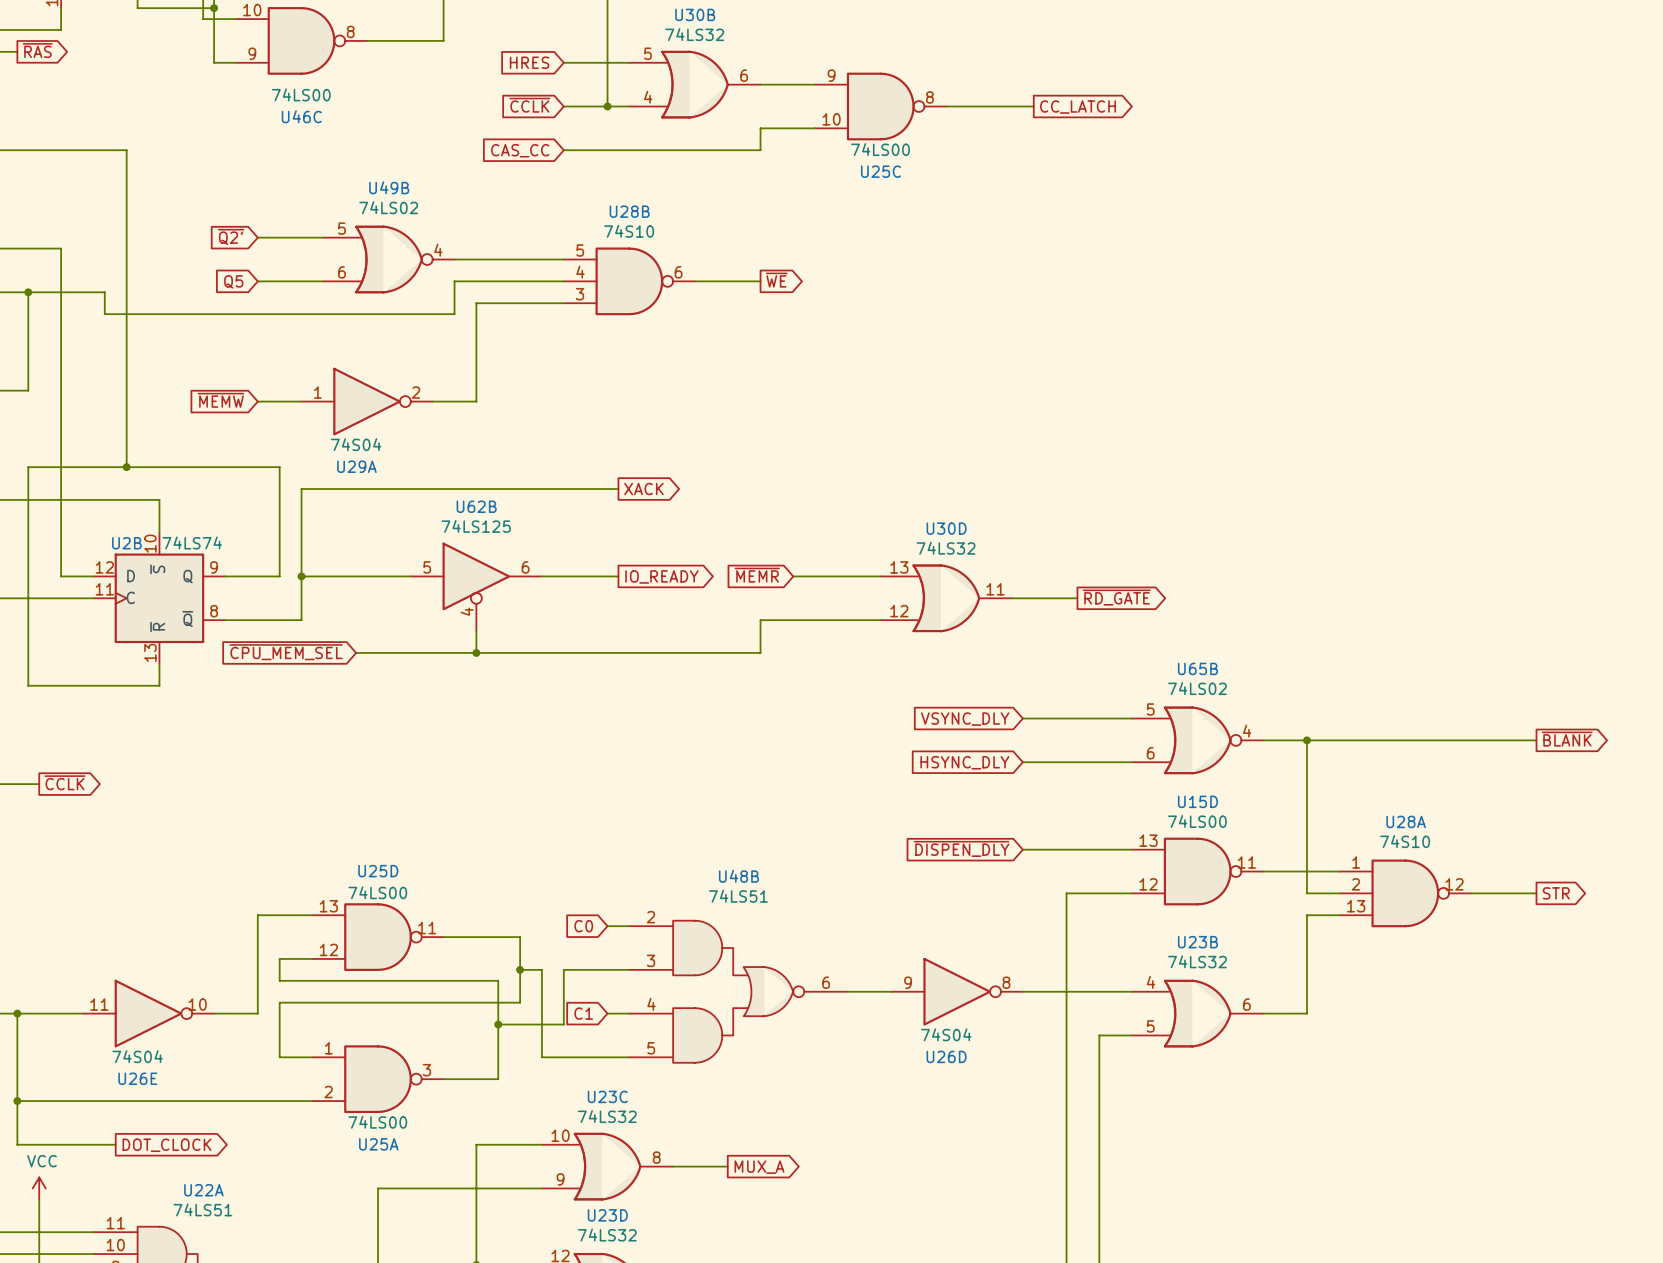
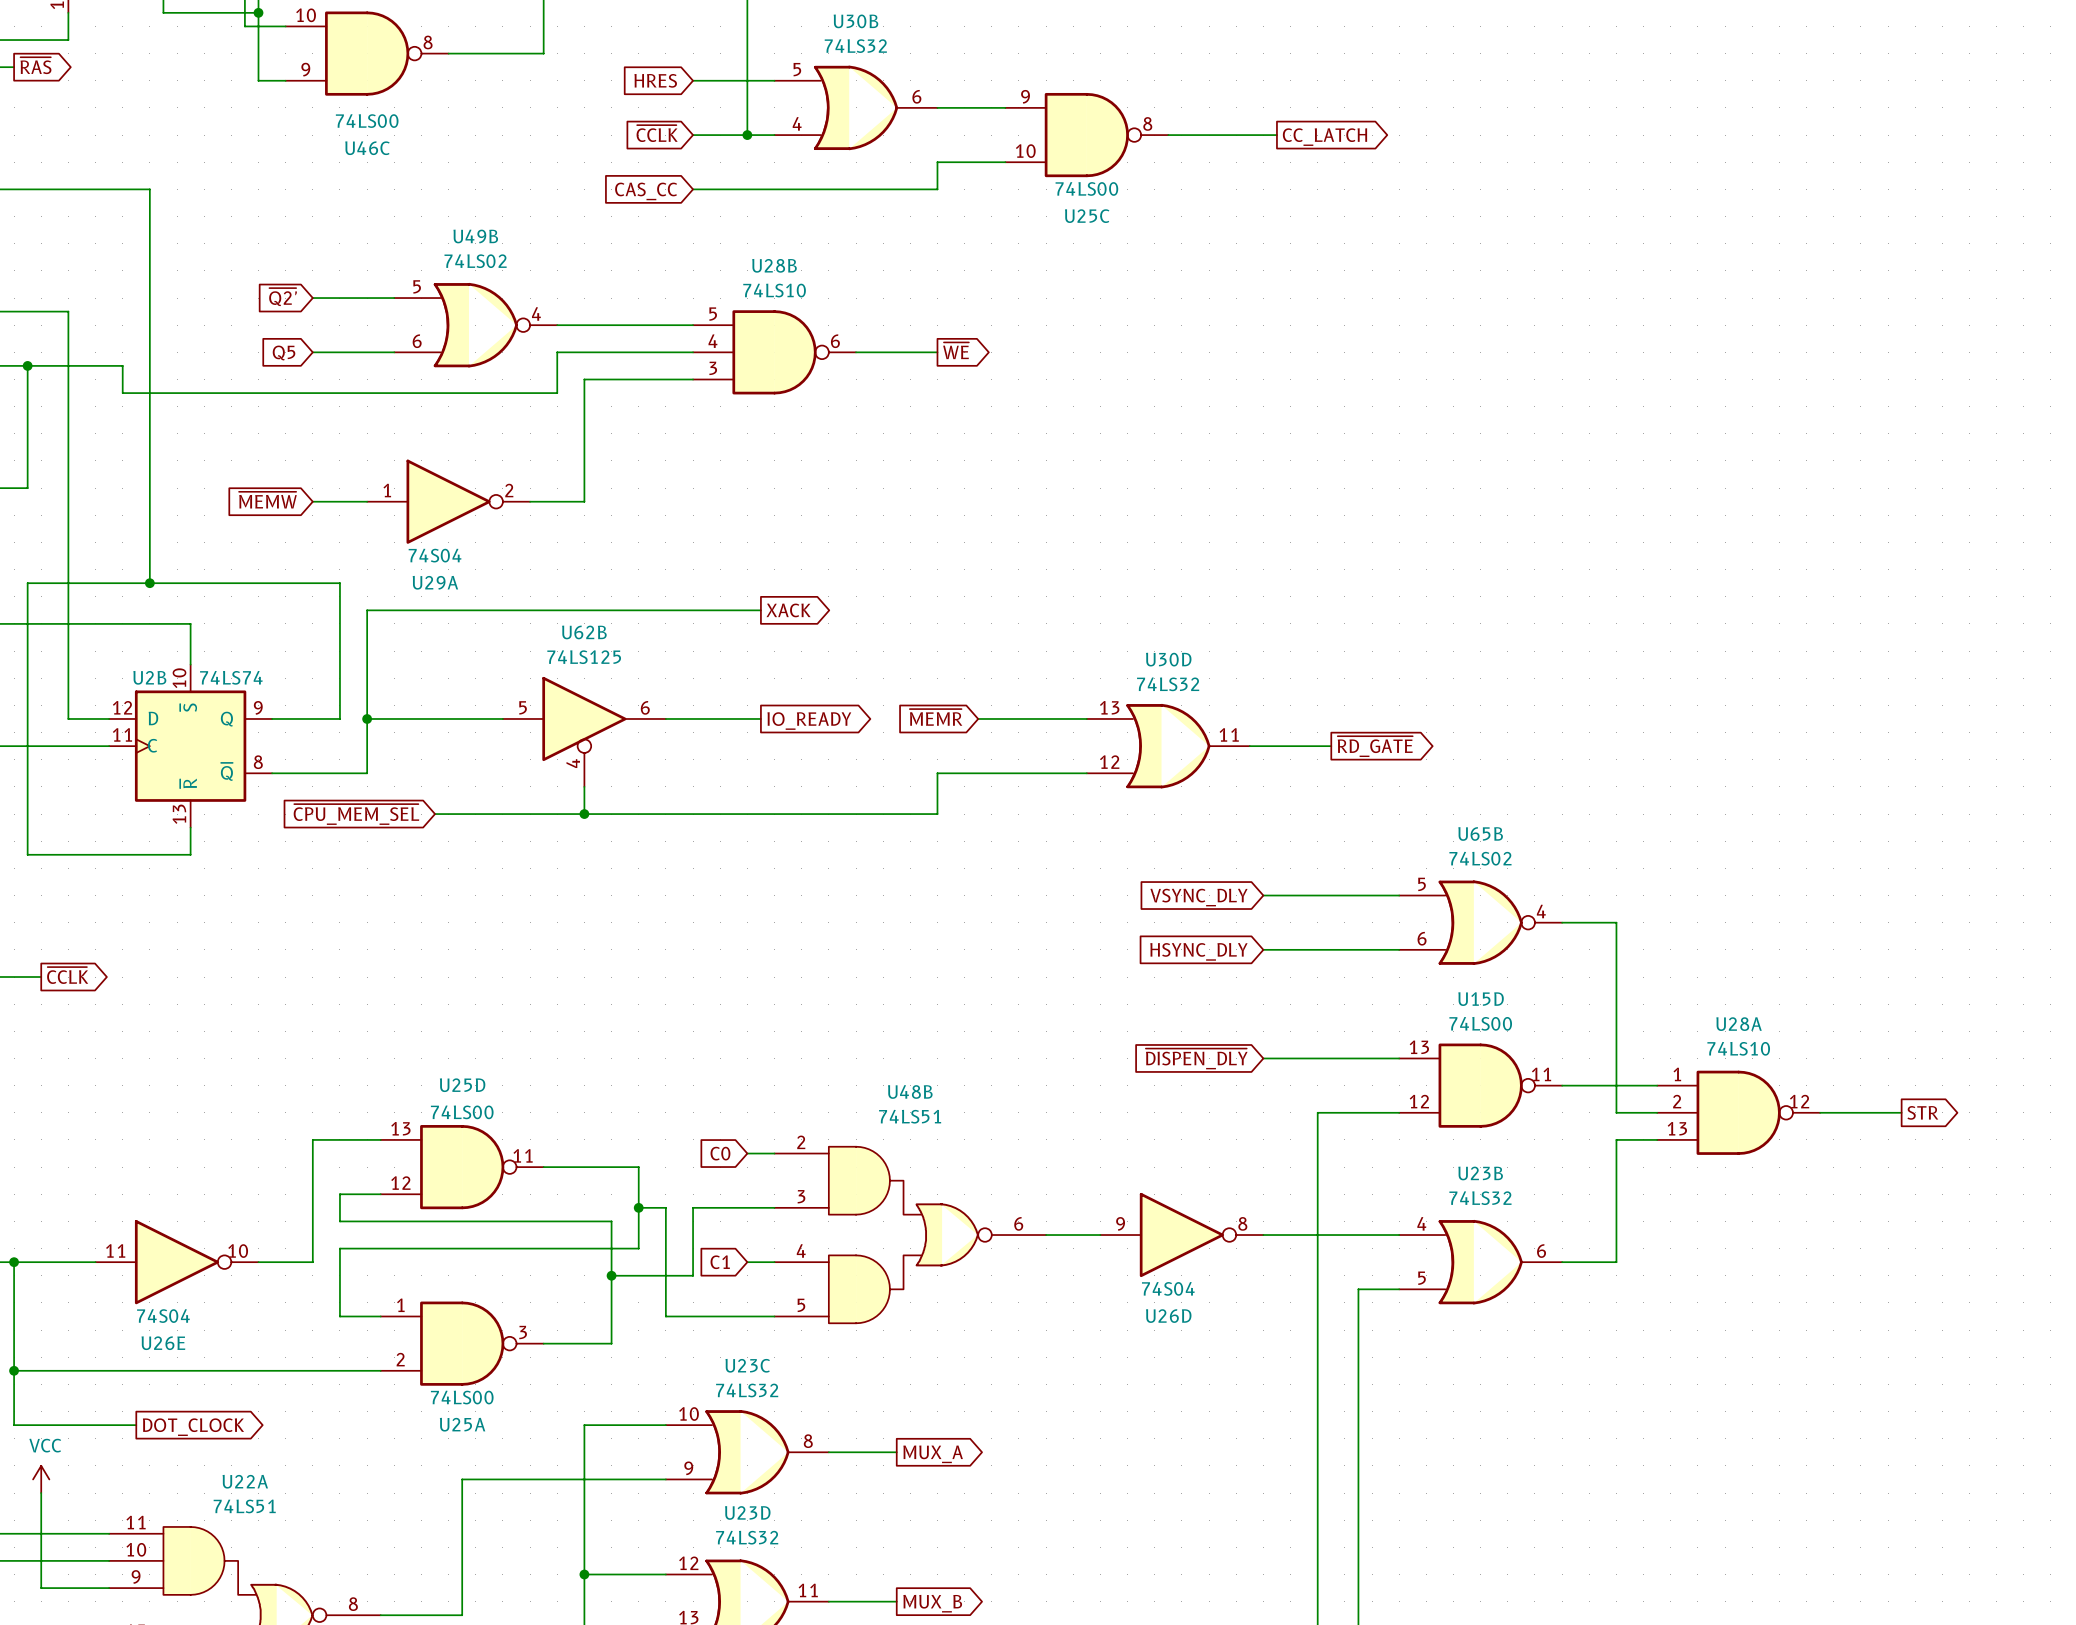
U28B value: 74S10 (629, 231) -> 74LS10 (774, 290)
global label: ~{BLANK} (1567, 739) -> none
wire: (1306, 740) (1536, 740) -> none
junction: (1306, 740) -> none
U28A value: 74S10 (1405, 841) -> 74LS10 (1738, 1048)

